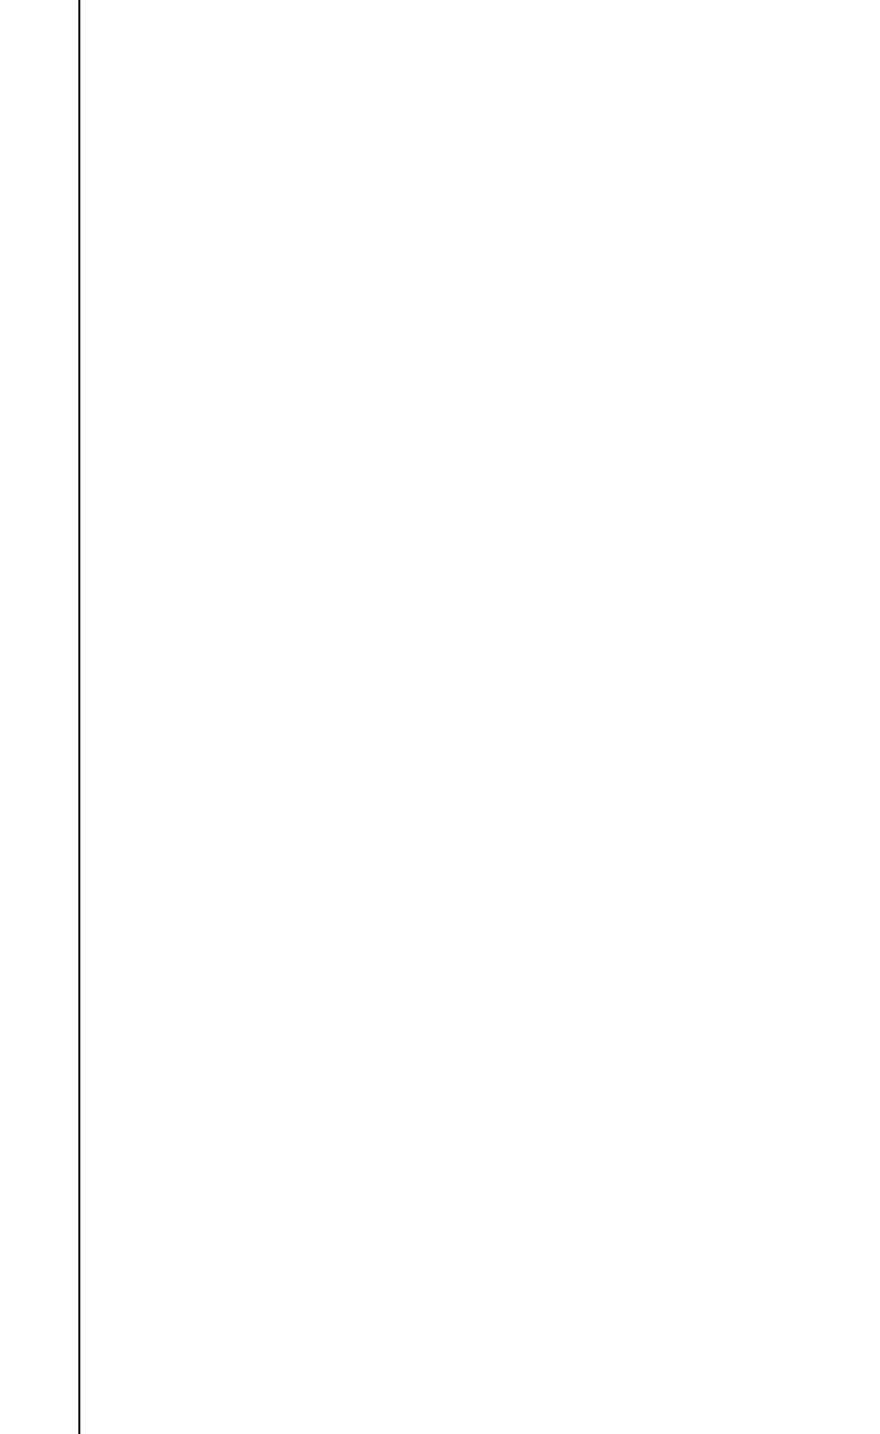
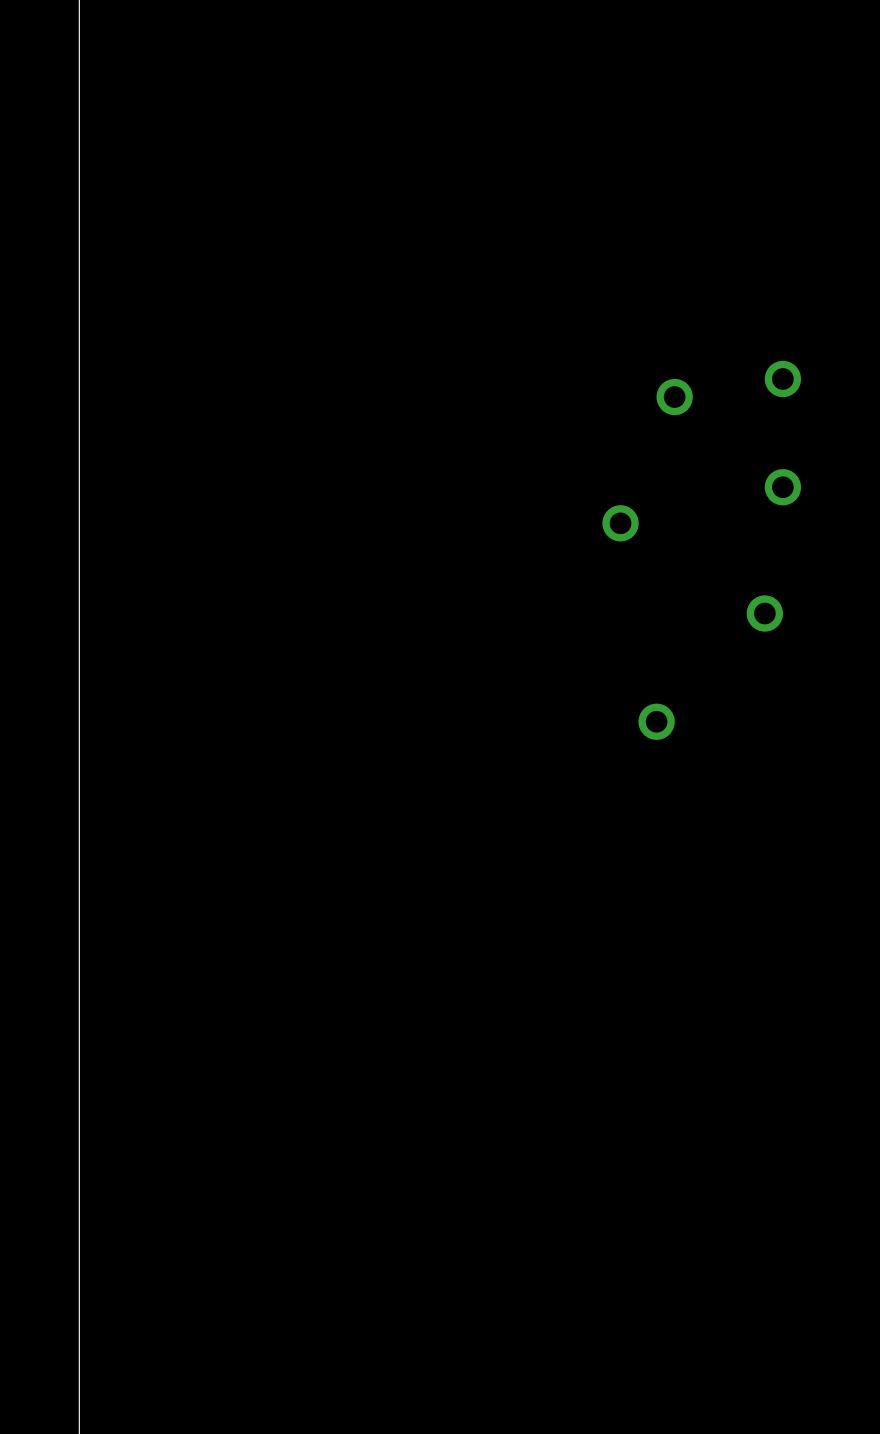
via: none -> (782, 378)
via: none -> (674, 397)
via: none -> (782, 487)
via: none -> (620, 523)
via: none -> (764, 613)
via: none -> (656, 721)

